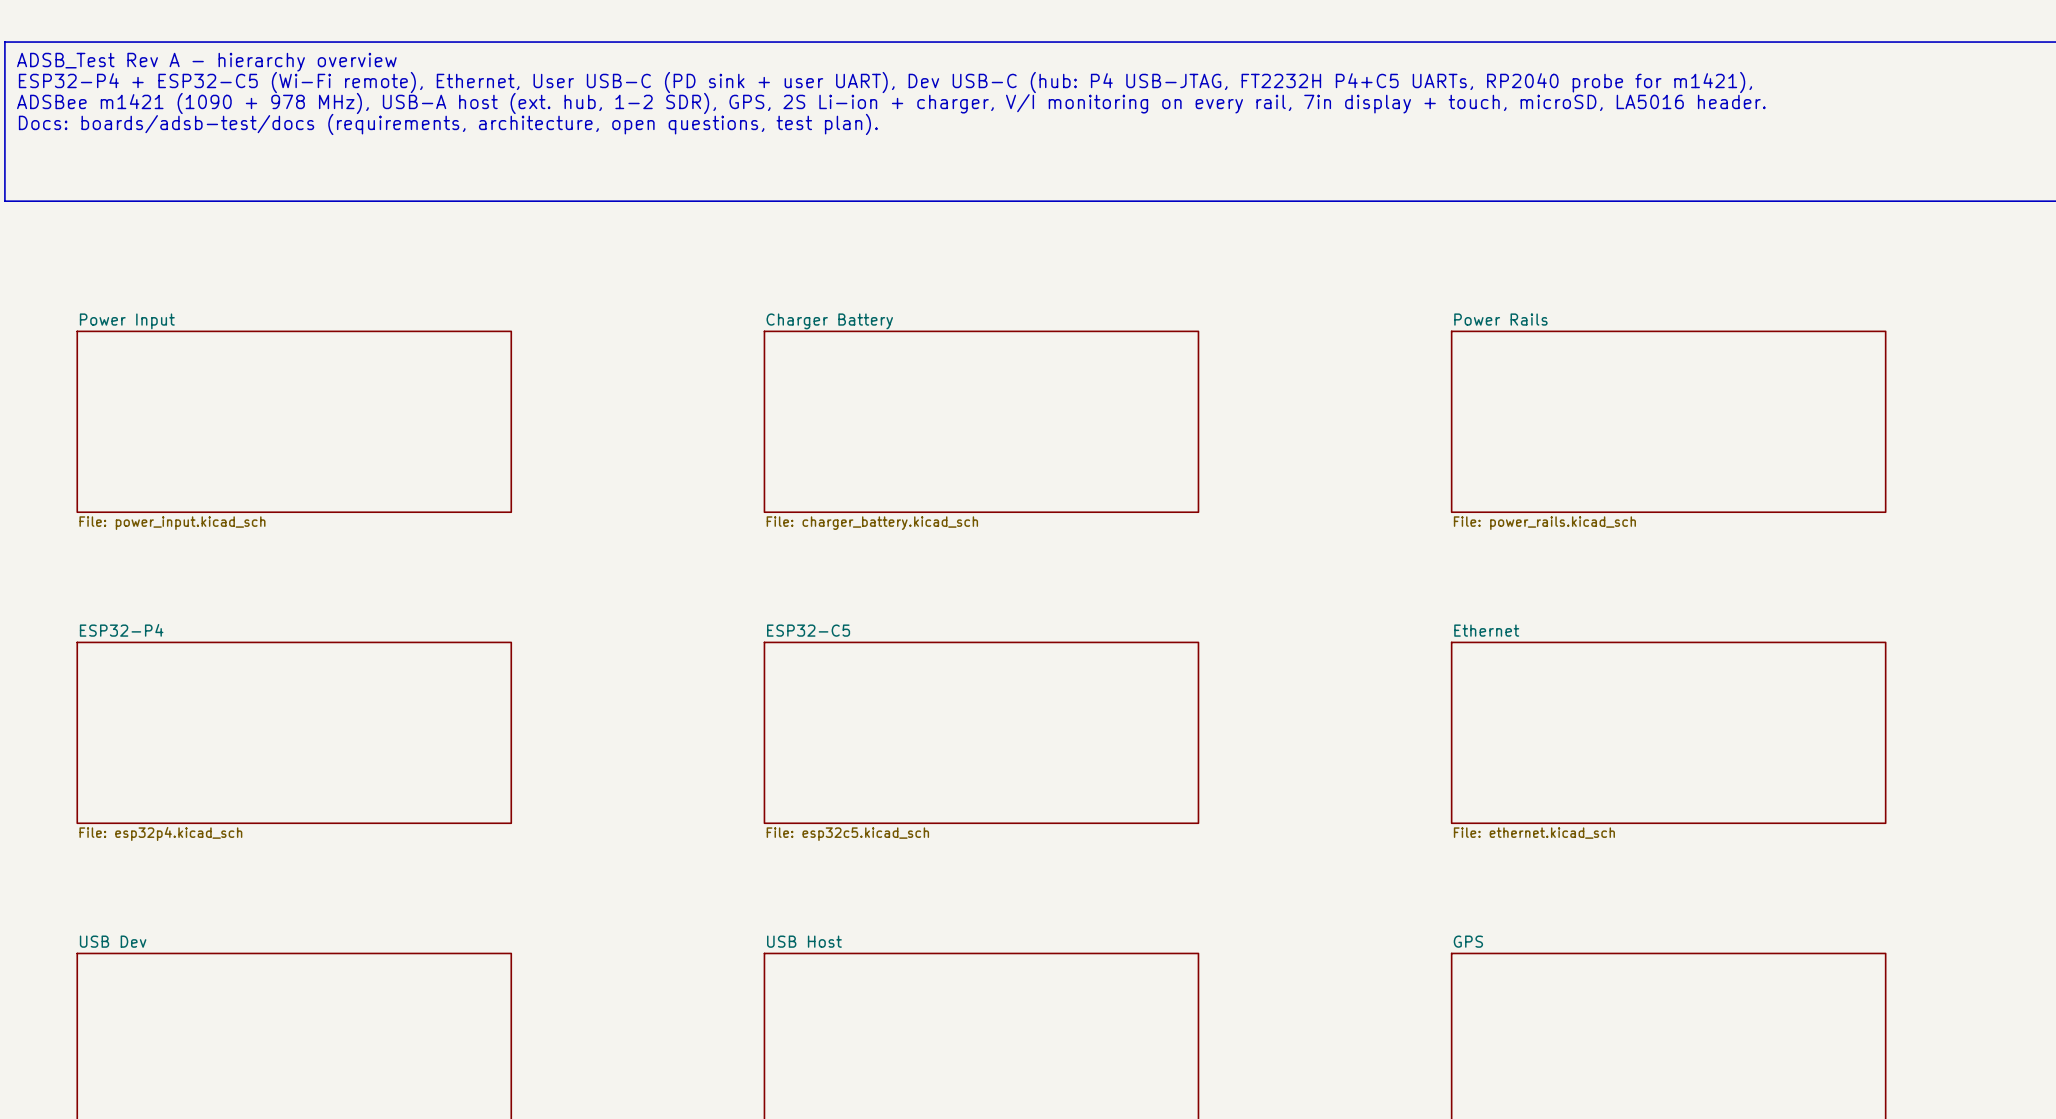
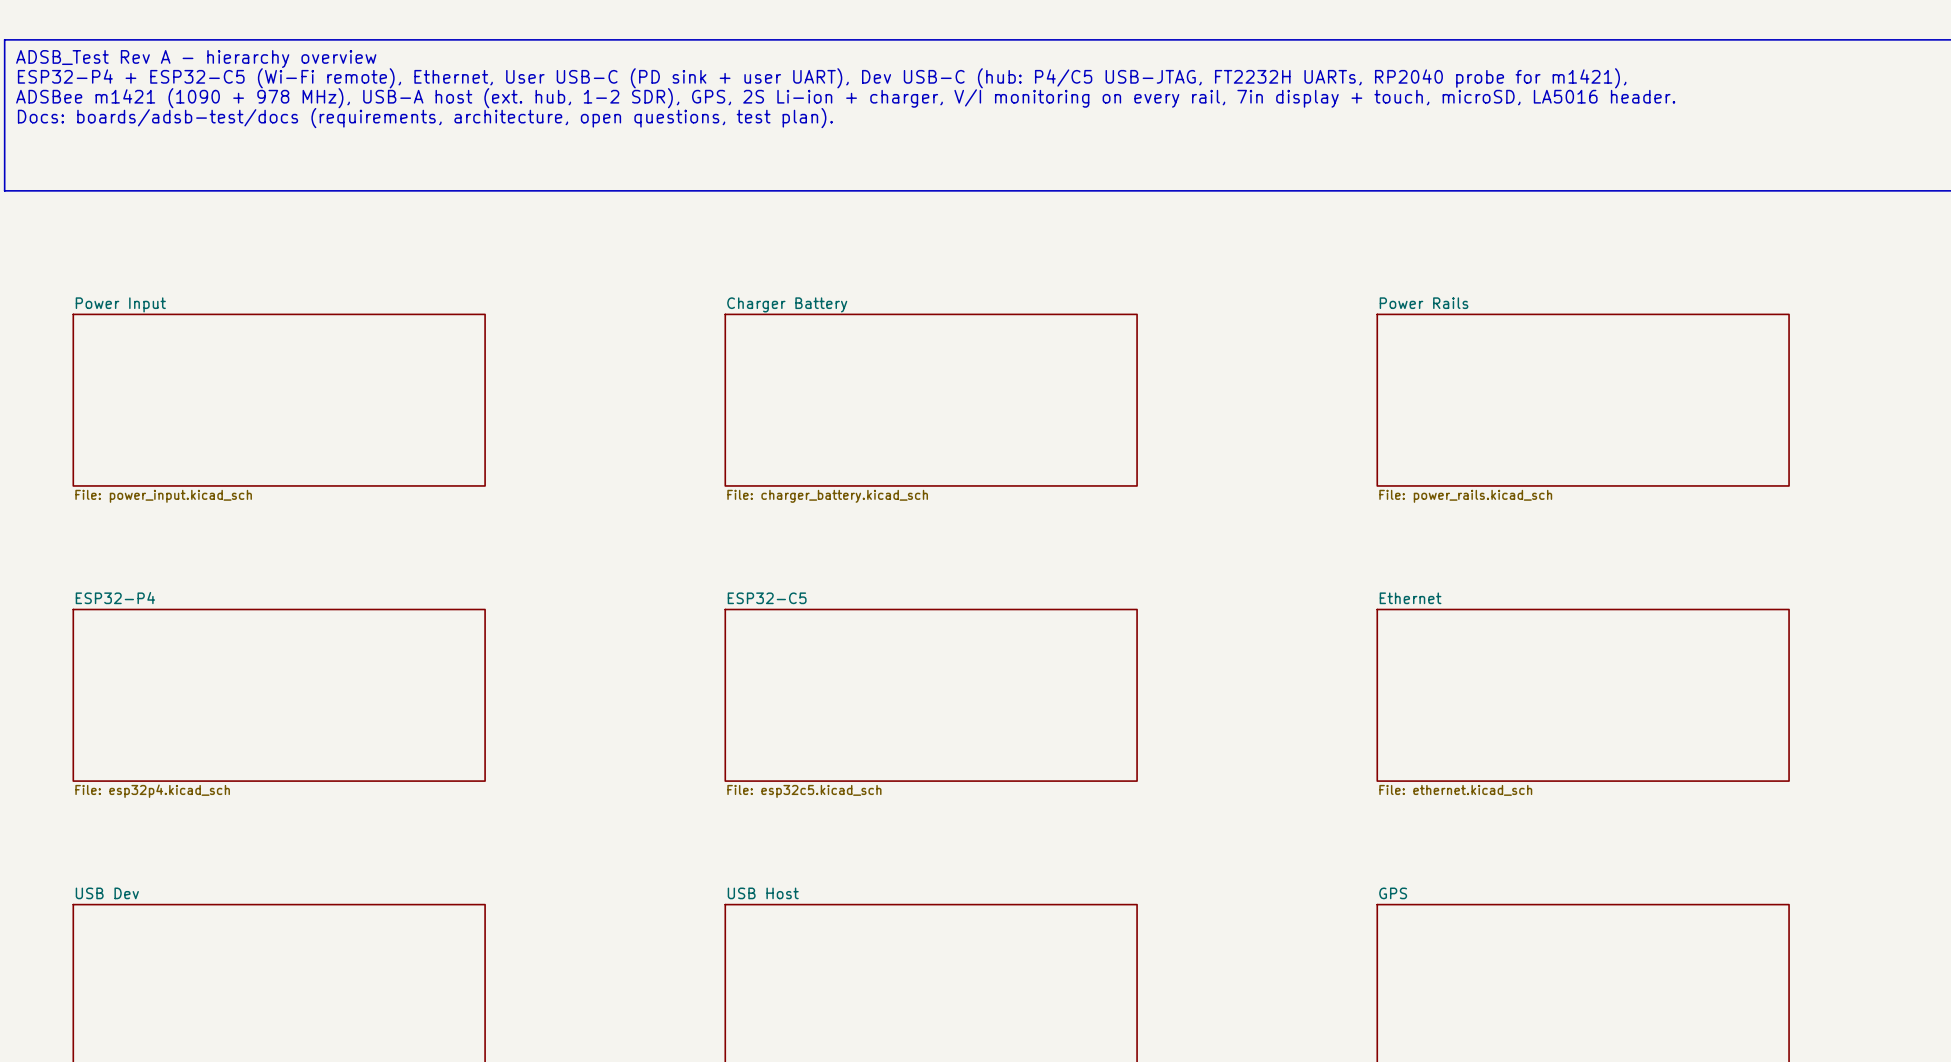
text: ESP32-P4 + ESP32-C5 (Wi-Fi remote), Ethernet, User USB-C (PD sink + user UART), Dev USB-C (hub: P4 USB-JTAG, FT2232H P4+C5 UARTs, RP2040 probe for m1421), (885, 82) -> ESP32-P4 + ESP32-C5 (Wi-Fi remote), Ethernet, User USB-C (PD sink + user UART), Dev USB-C (hub: P4/C5 USB-JTAG, FT2232H UARTs, RP2040 probe for m1421), (822, 78)

